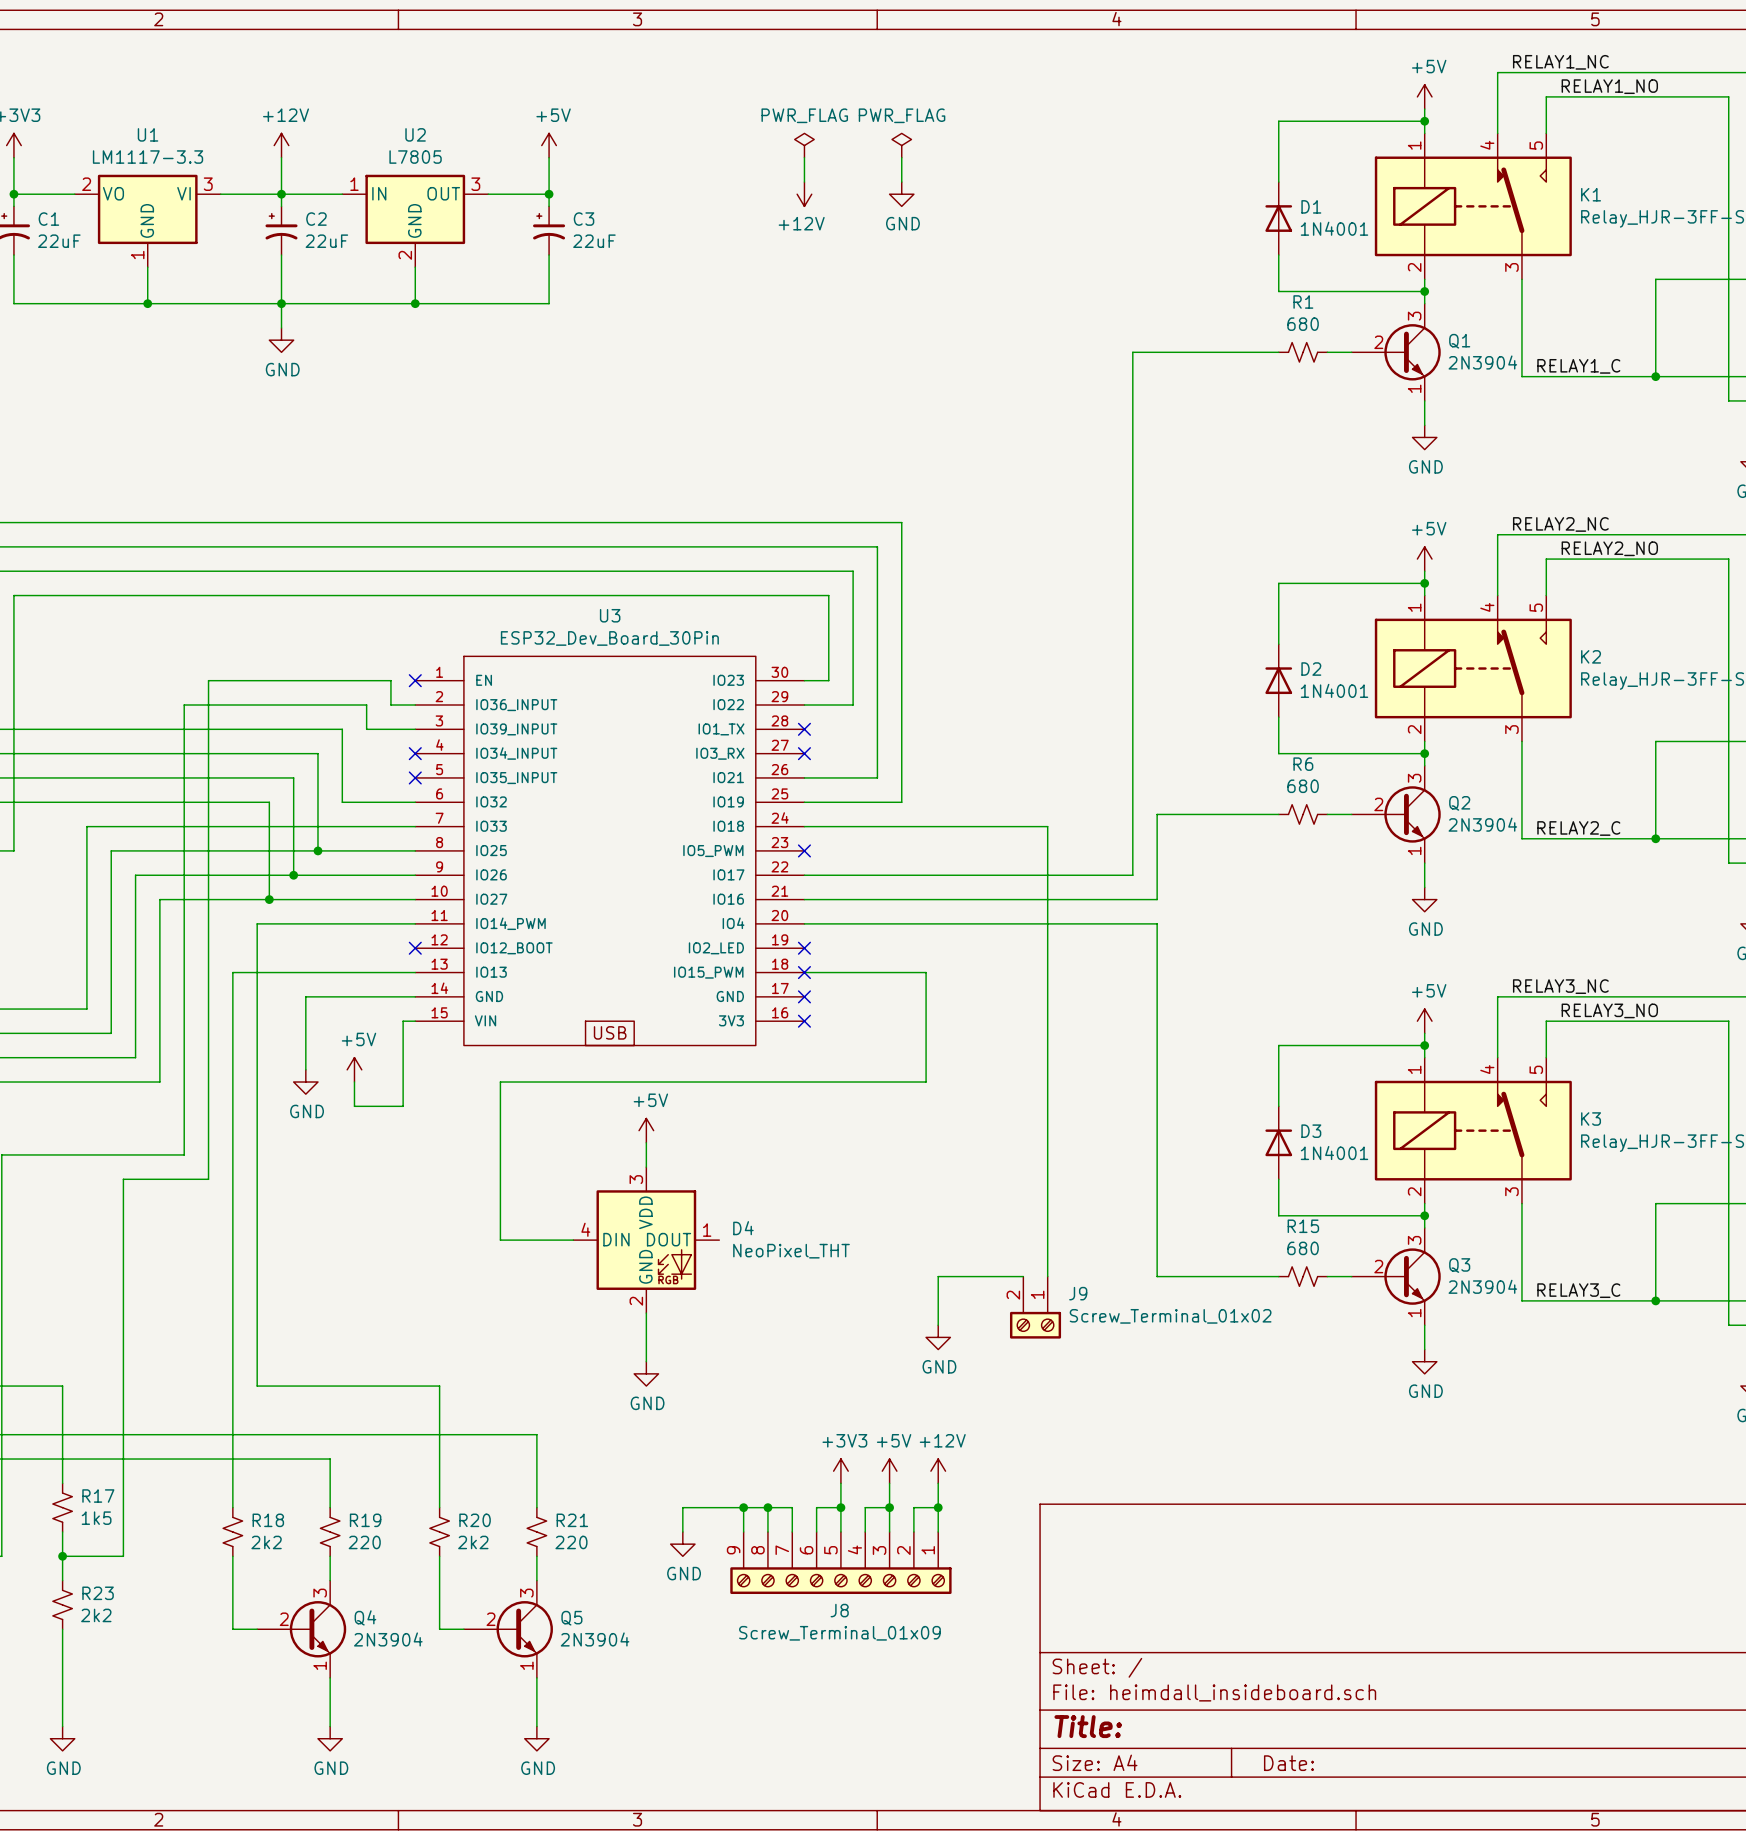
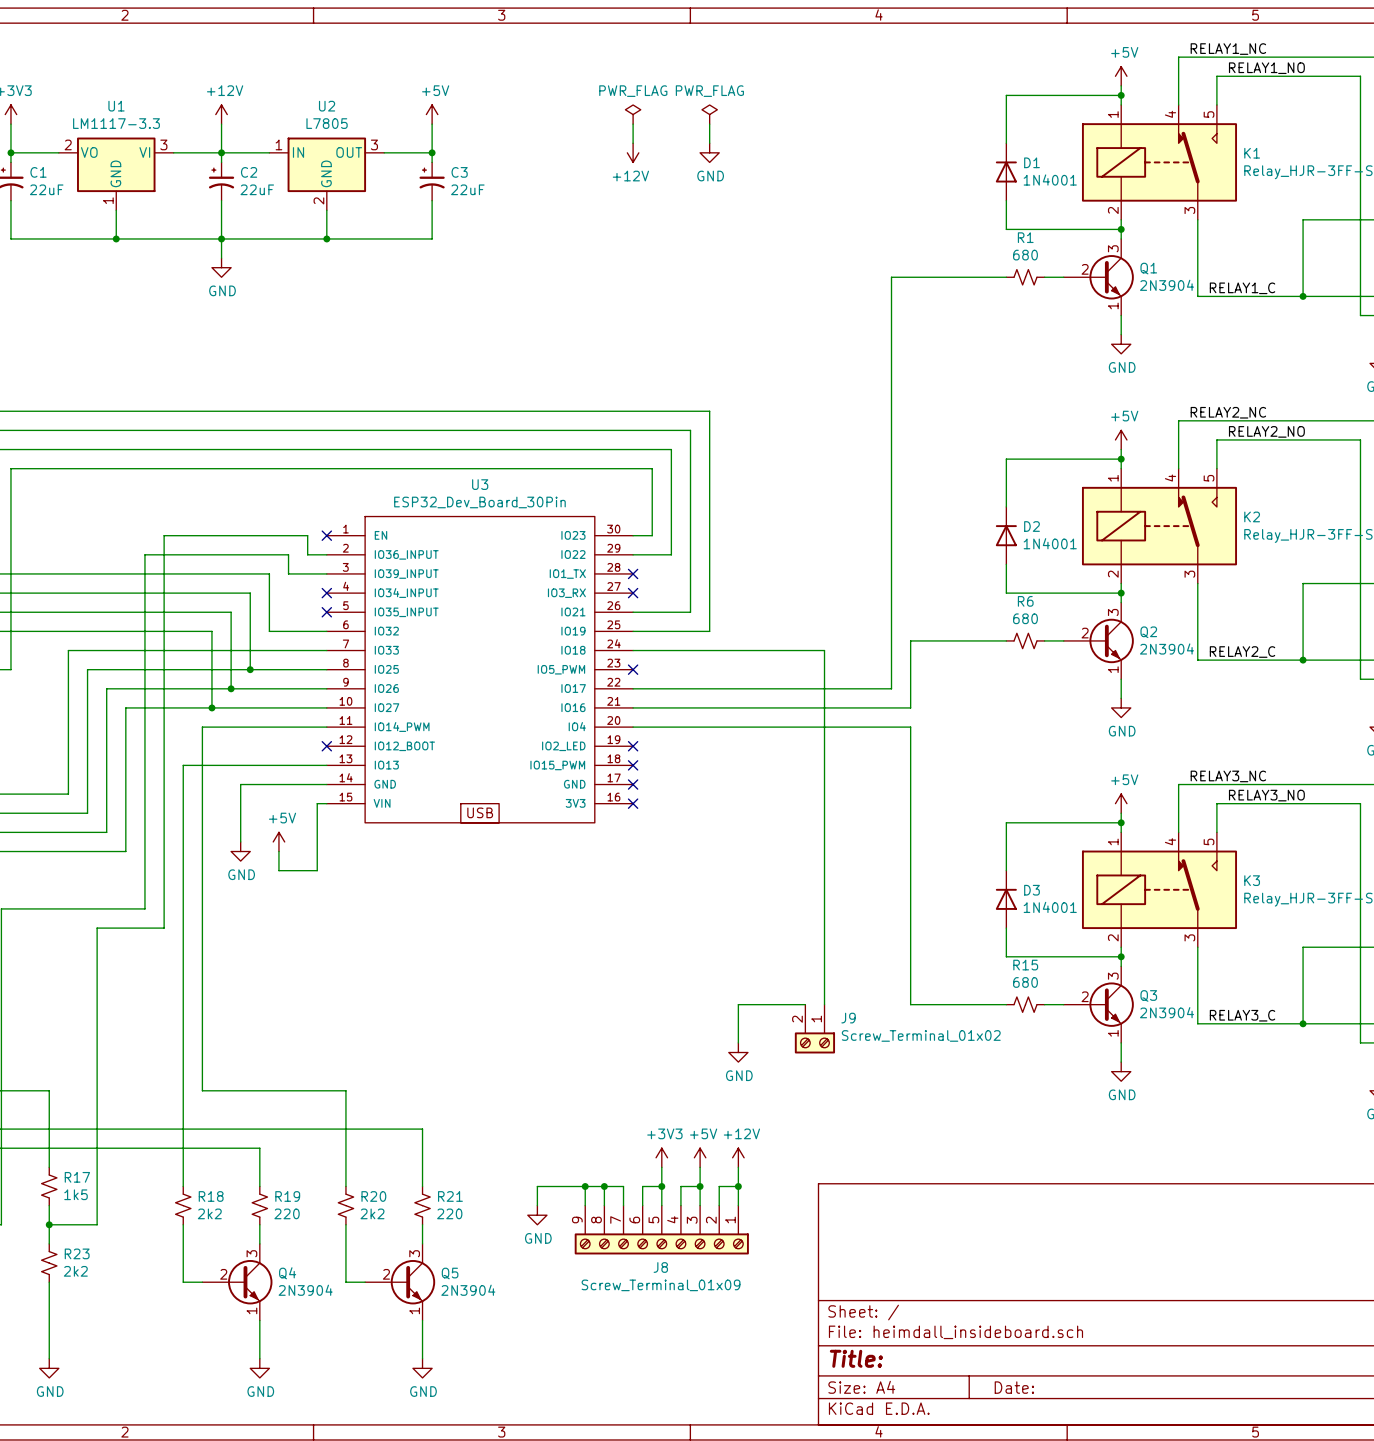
wire: (804, 972) (926, 972) (926, 1082) (500, 1082) (500, 1240) (573, 1240) -> none
power symbol: +5V (646, 1130) -> none
wire: (646, 1142) (646, 1167) -> none
D4: NeoPixel_THT (646, 1240) -> none
wire: (646, 1313) (646, 1361) -> none
power symbol: GND (646, 1373) -> none

